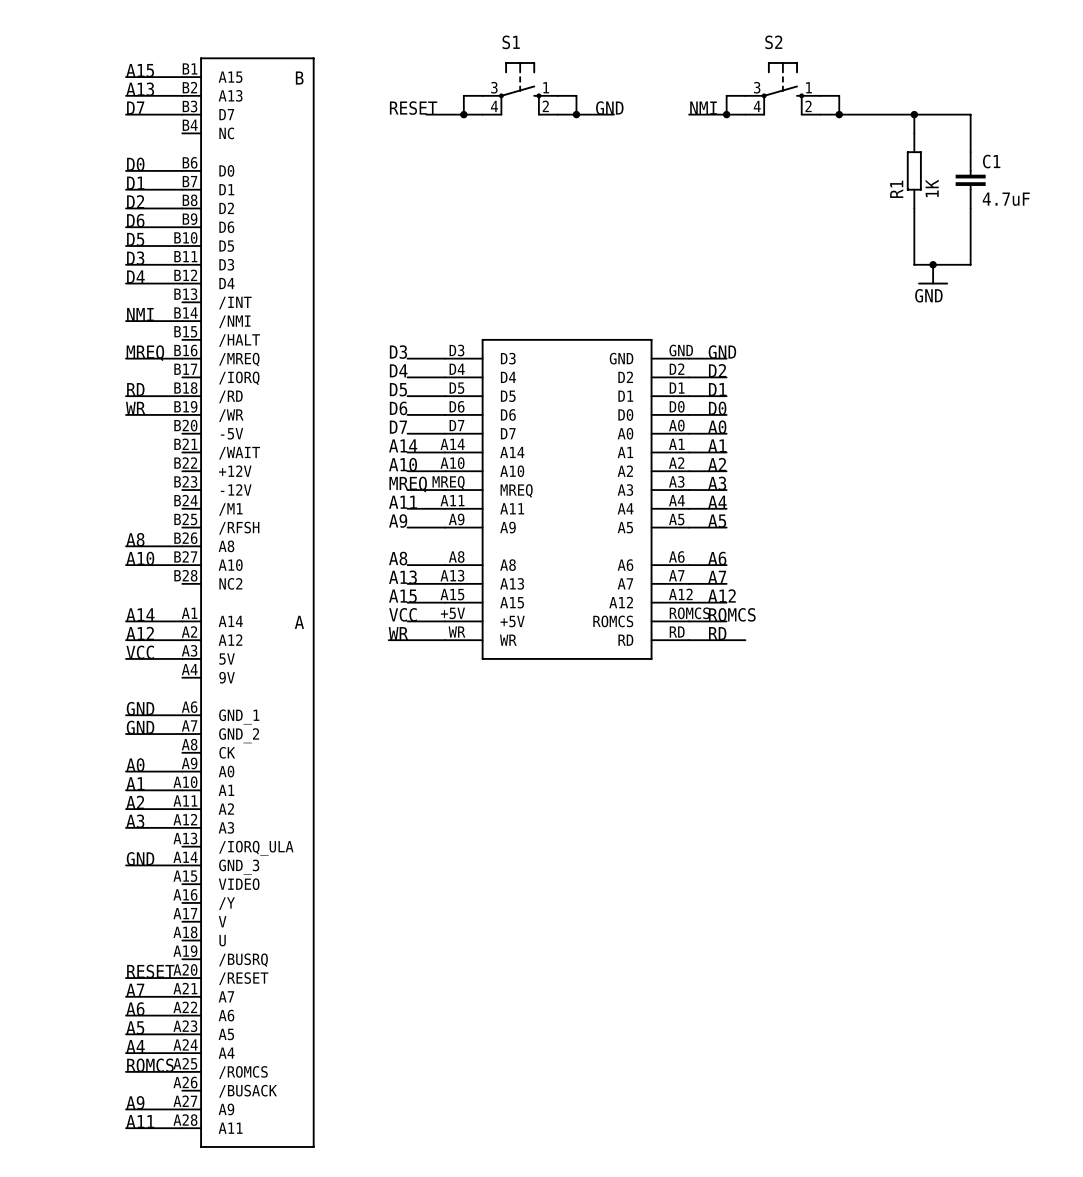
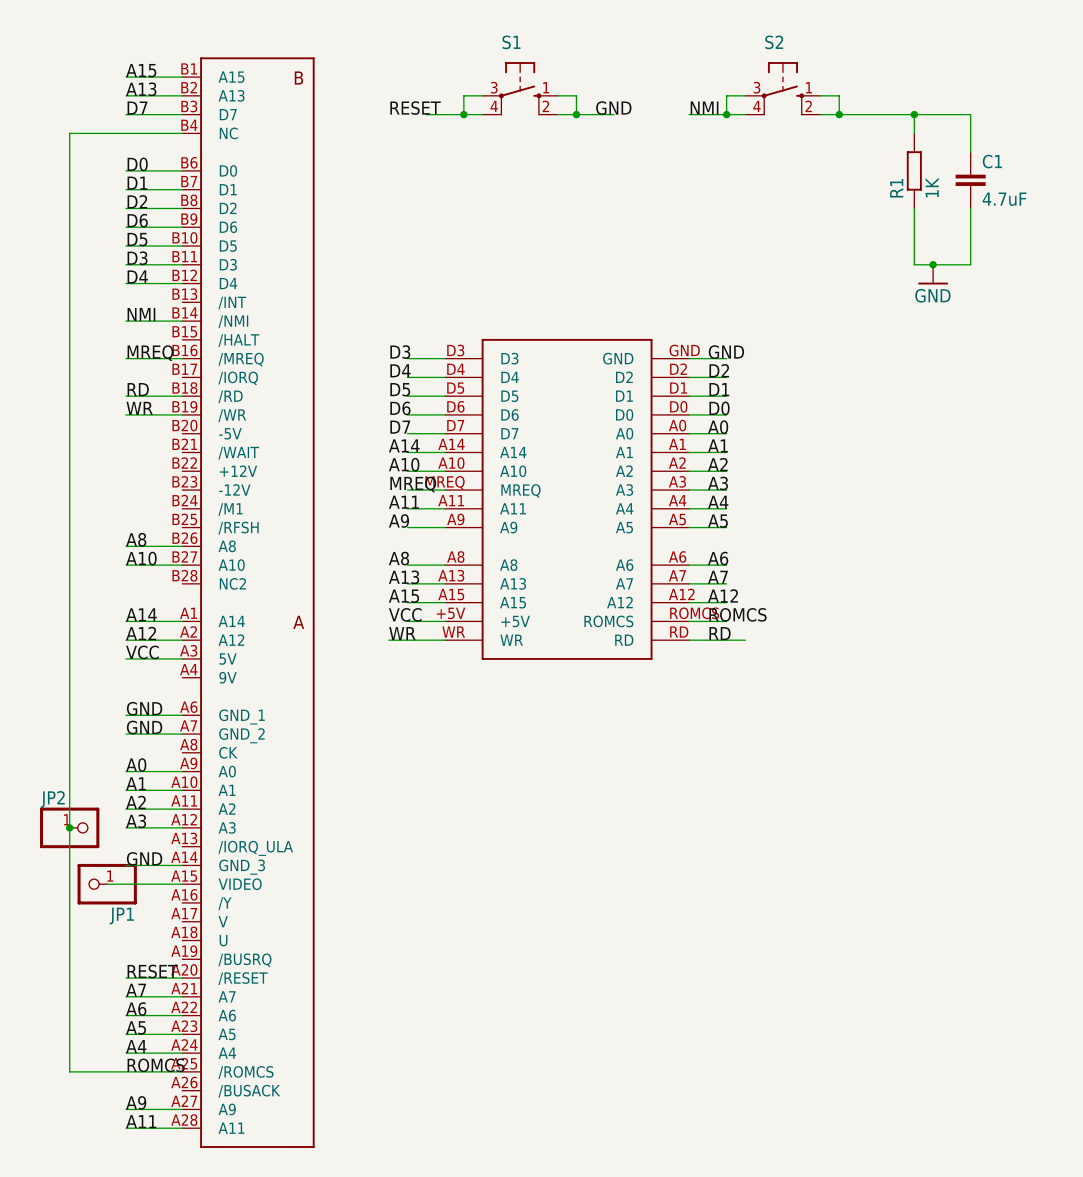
wire: none -> (182, 133) (69, 133) (69, 1071) (125, 1071)
JP2: none -> (69, 827)
junction: none -> (69, 827)
wire: none -> (107, 884) (182, 884)
JP1: none -> (107, 884)

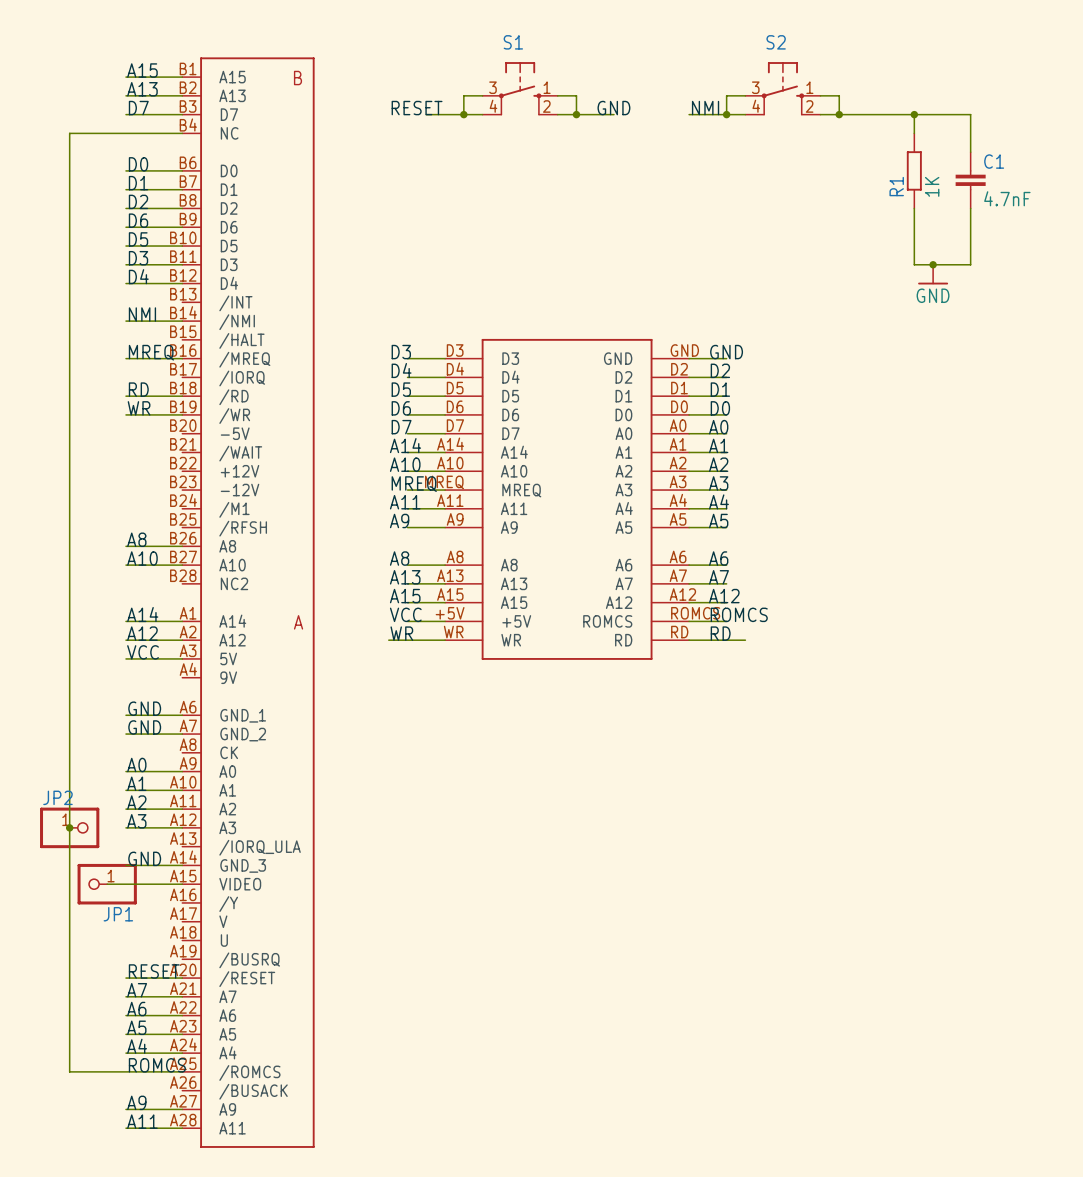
C1 value: 4.7uF (1004, 199) -> 4.7nF (1007, 198)

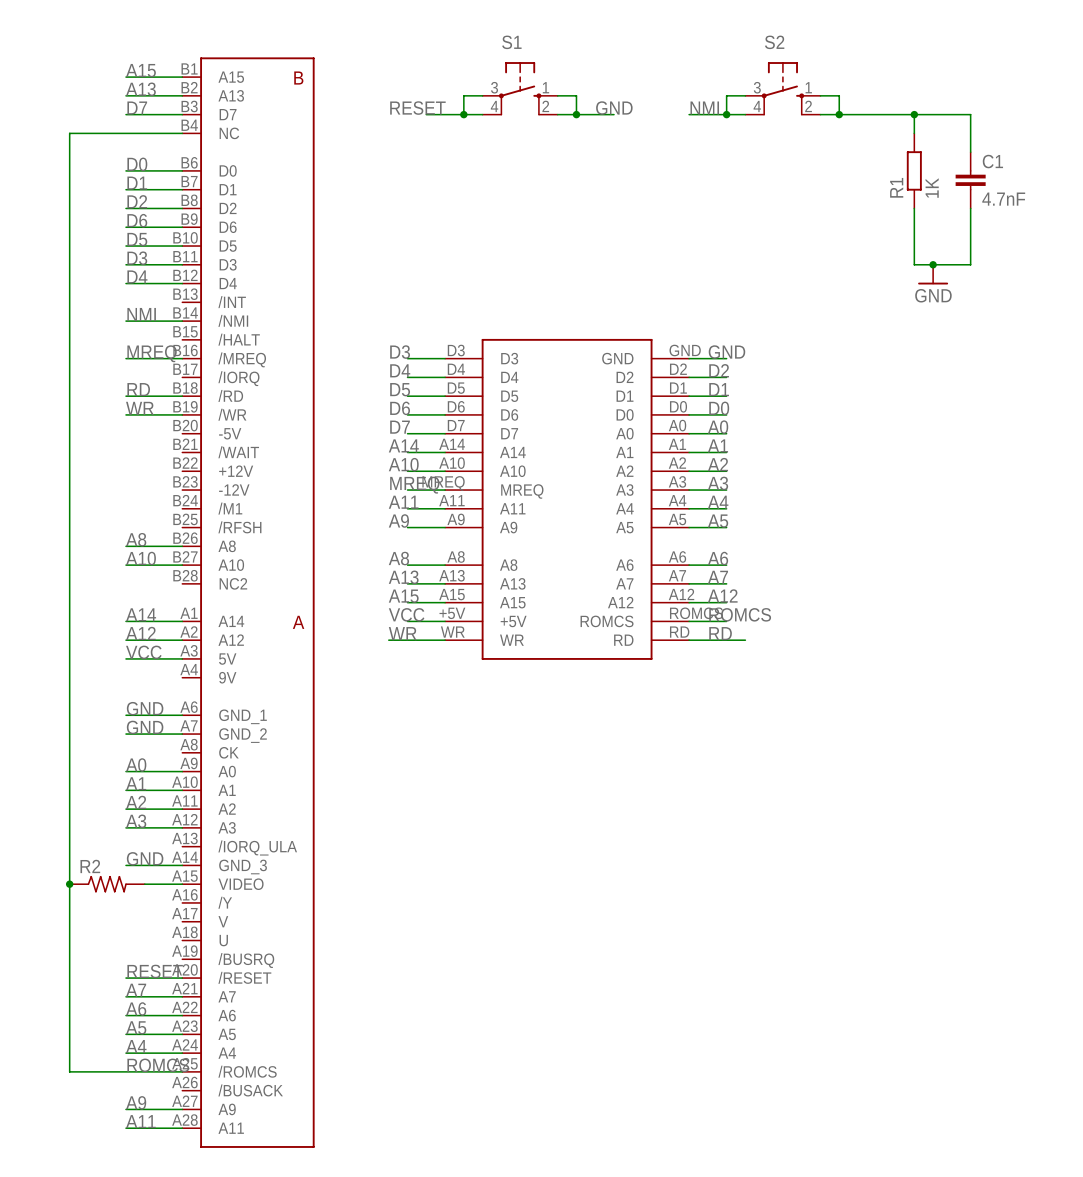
JP2: (69, 827) -> none
junction: (69, 827) -> none
junction: none -> (69, 884)
JP1: (107, 884) -> none
R2: none -> (107, 884)

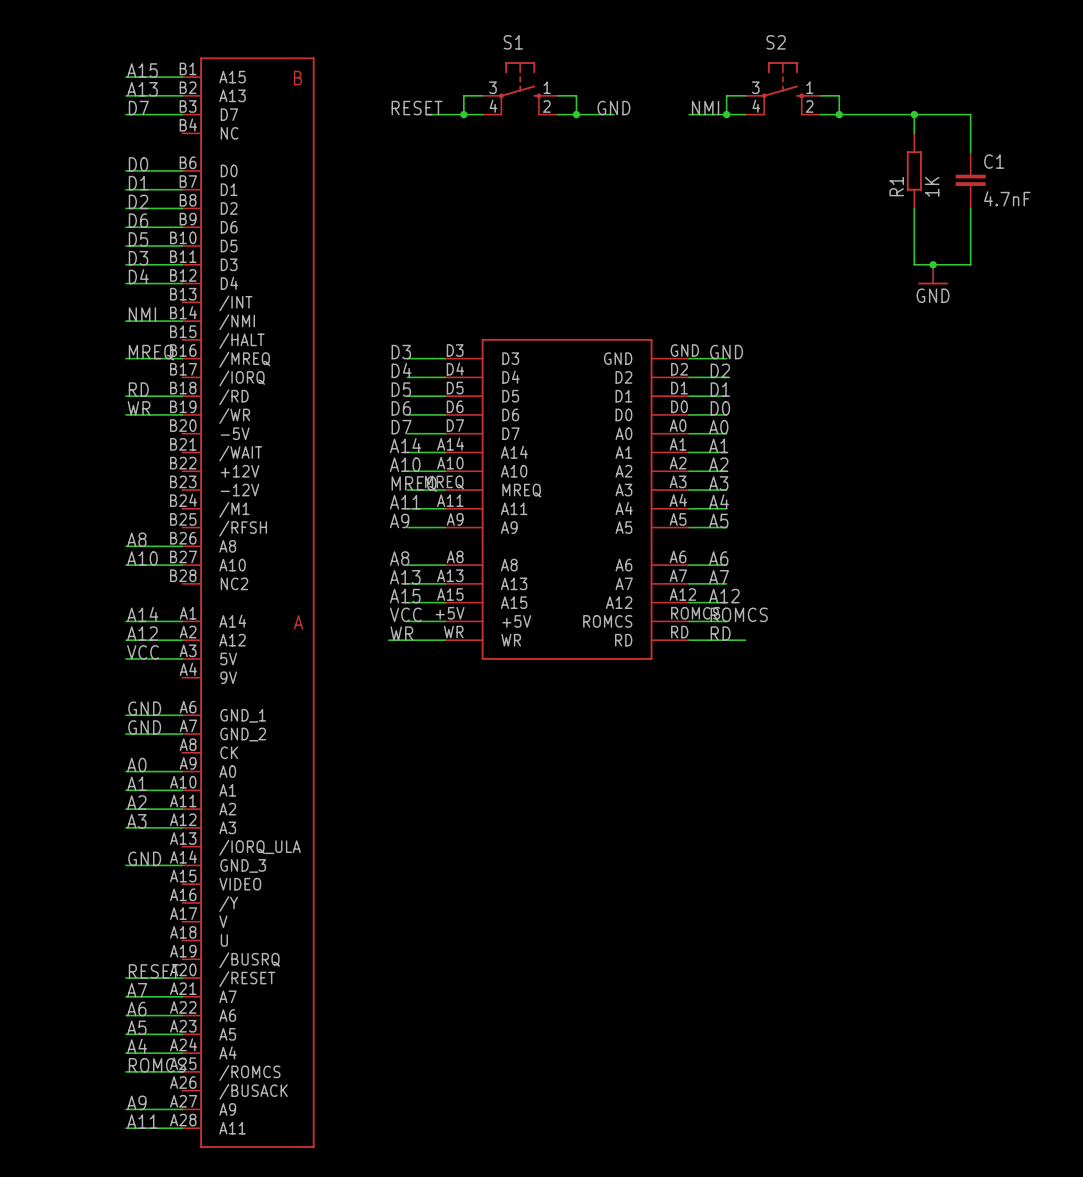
wire: (182, 133) (69, 133) (69, 1071) (125, 1071) -> none
junction: (69, 884) -> none
R2: (107, 884) -> none
wire: (144, 884) (182, 884) -> none

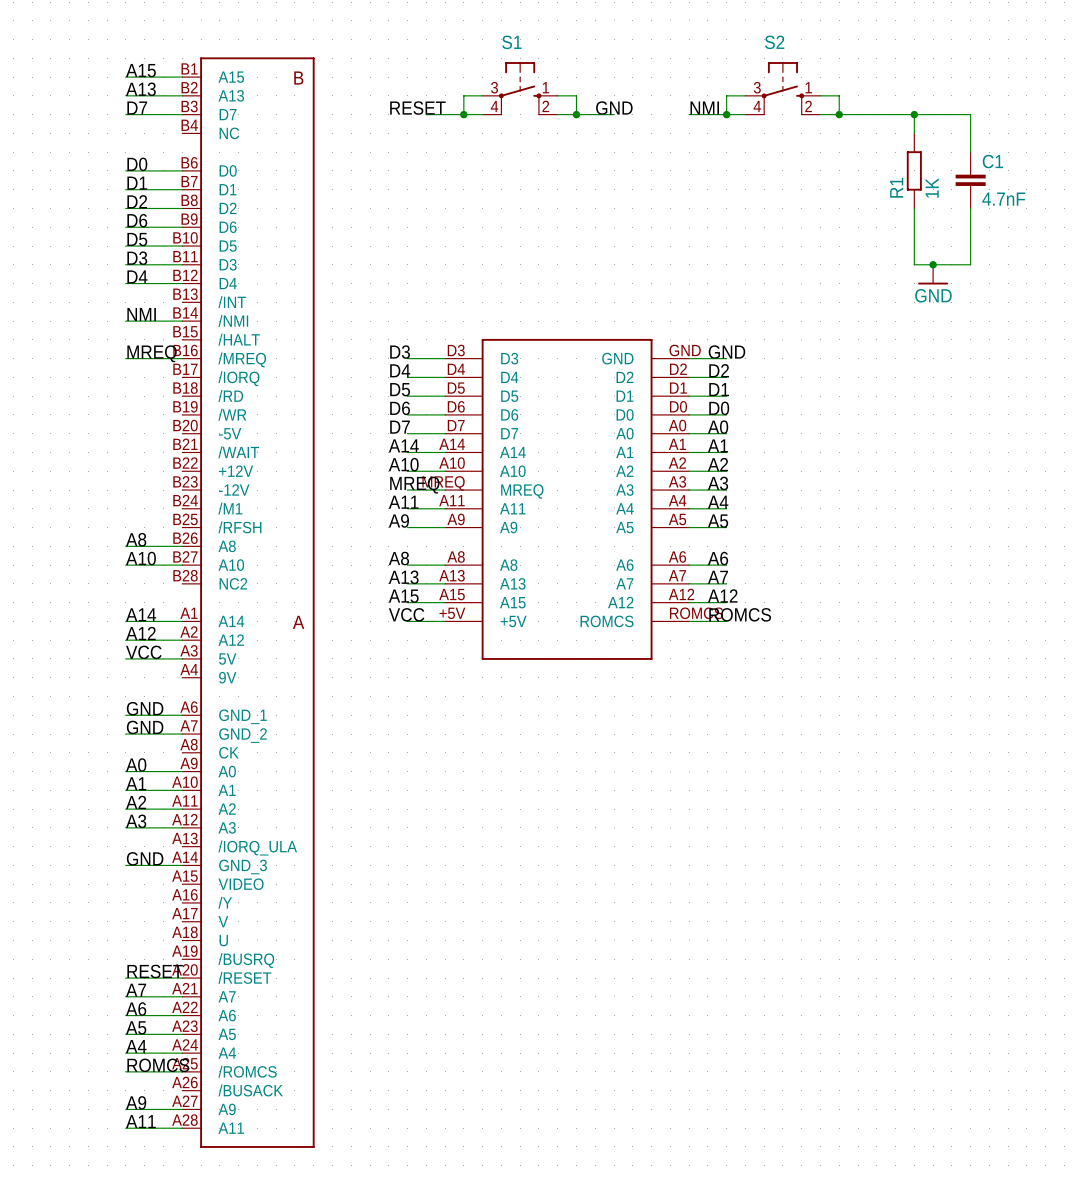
part symbol: [445, 338, 690, 660] -> [445, 338, 690, 660]
label: RD (138, 389) -> none
wire: (125, 396) (182, 396) -> none
label: WR (139, 408) -> none
wire: (125, 414) (182, 414) -> none
label: WR (401, 633) -> none
label: RD (720, 633) -> none
wire: (388, 640) (445, 640) -> none
wire: (689, 640) (745, 640) -> none

